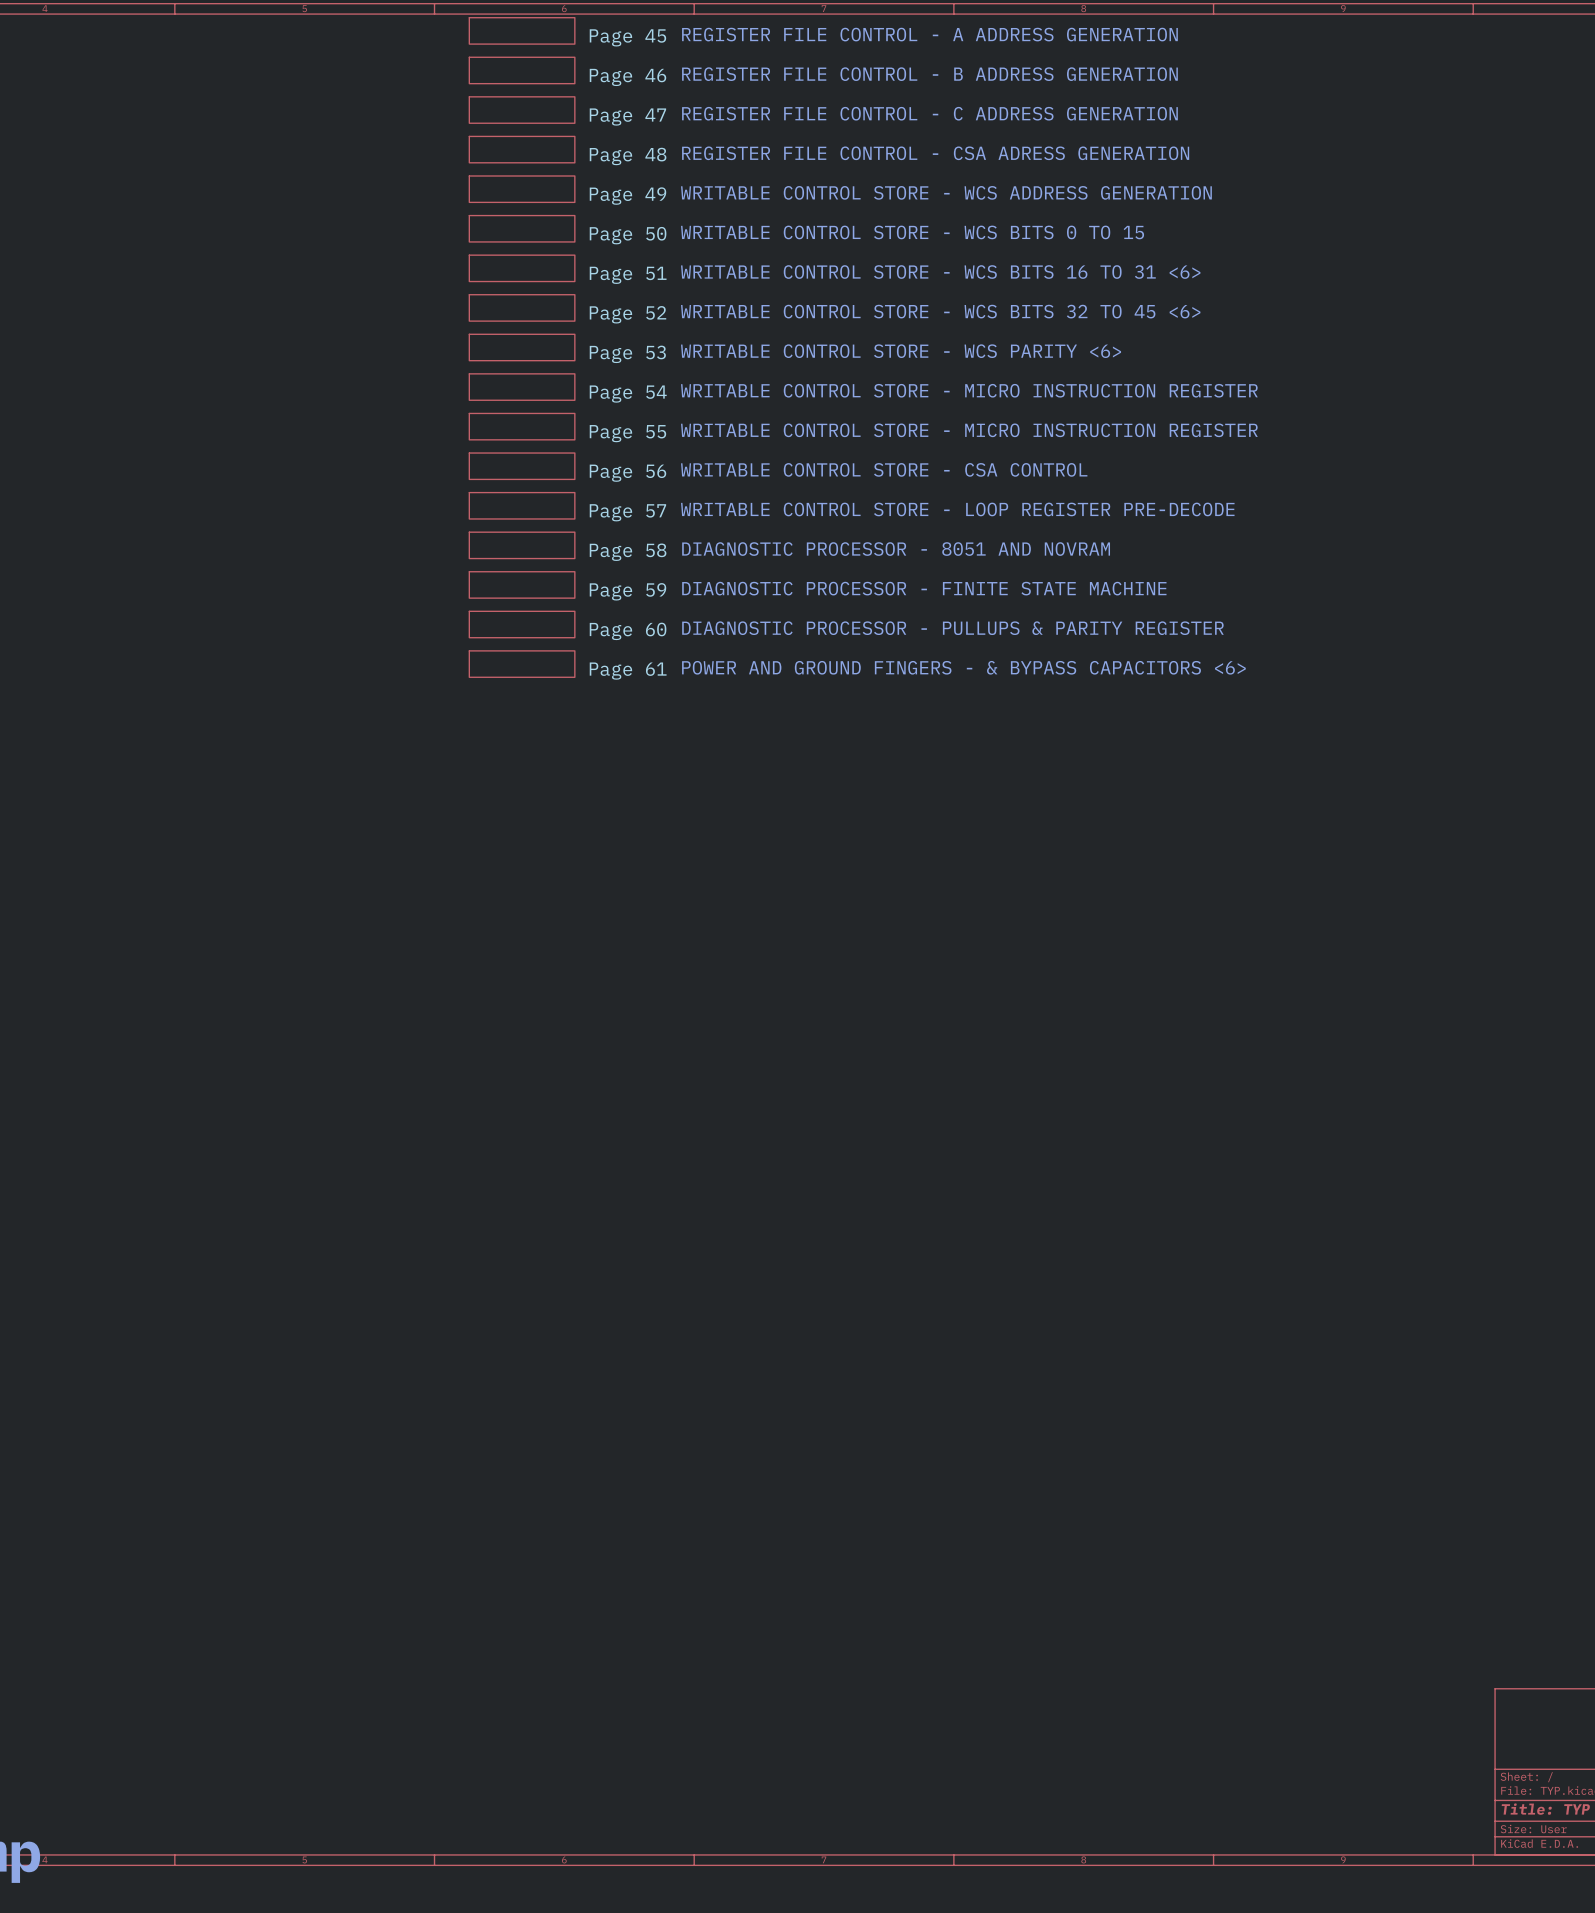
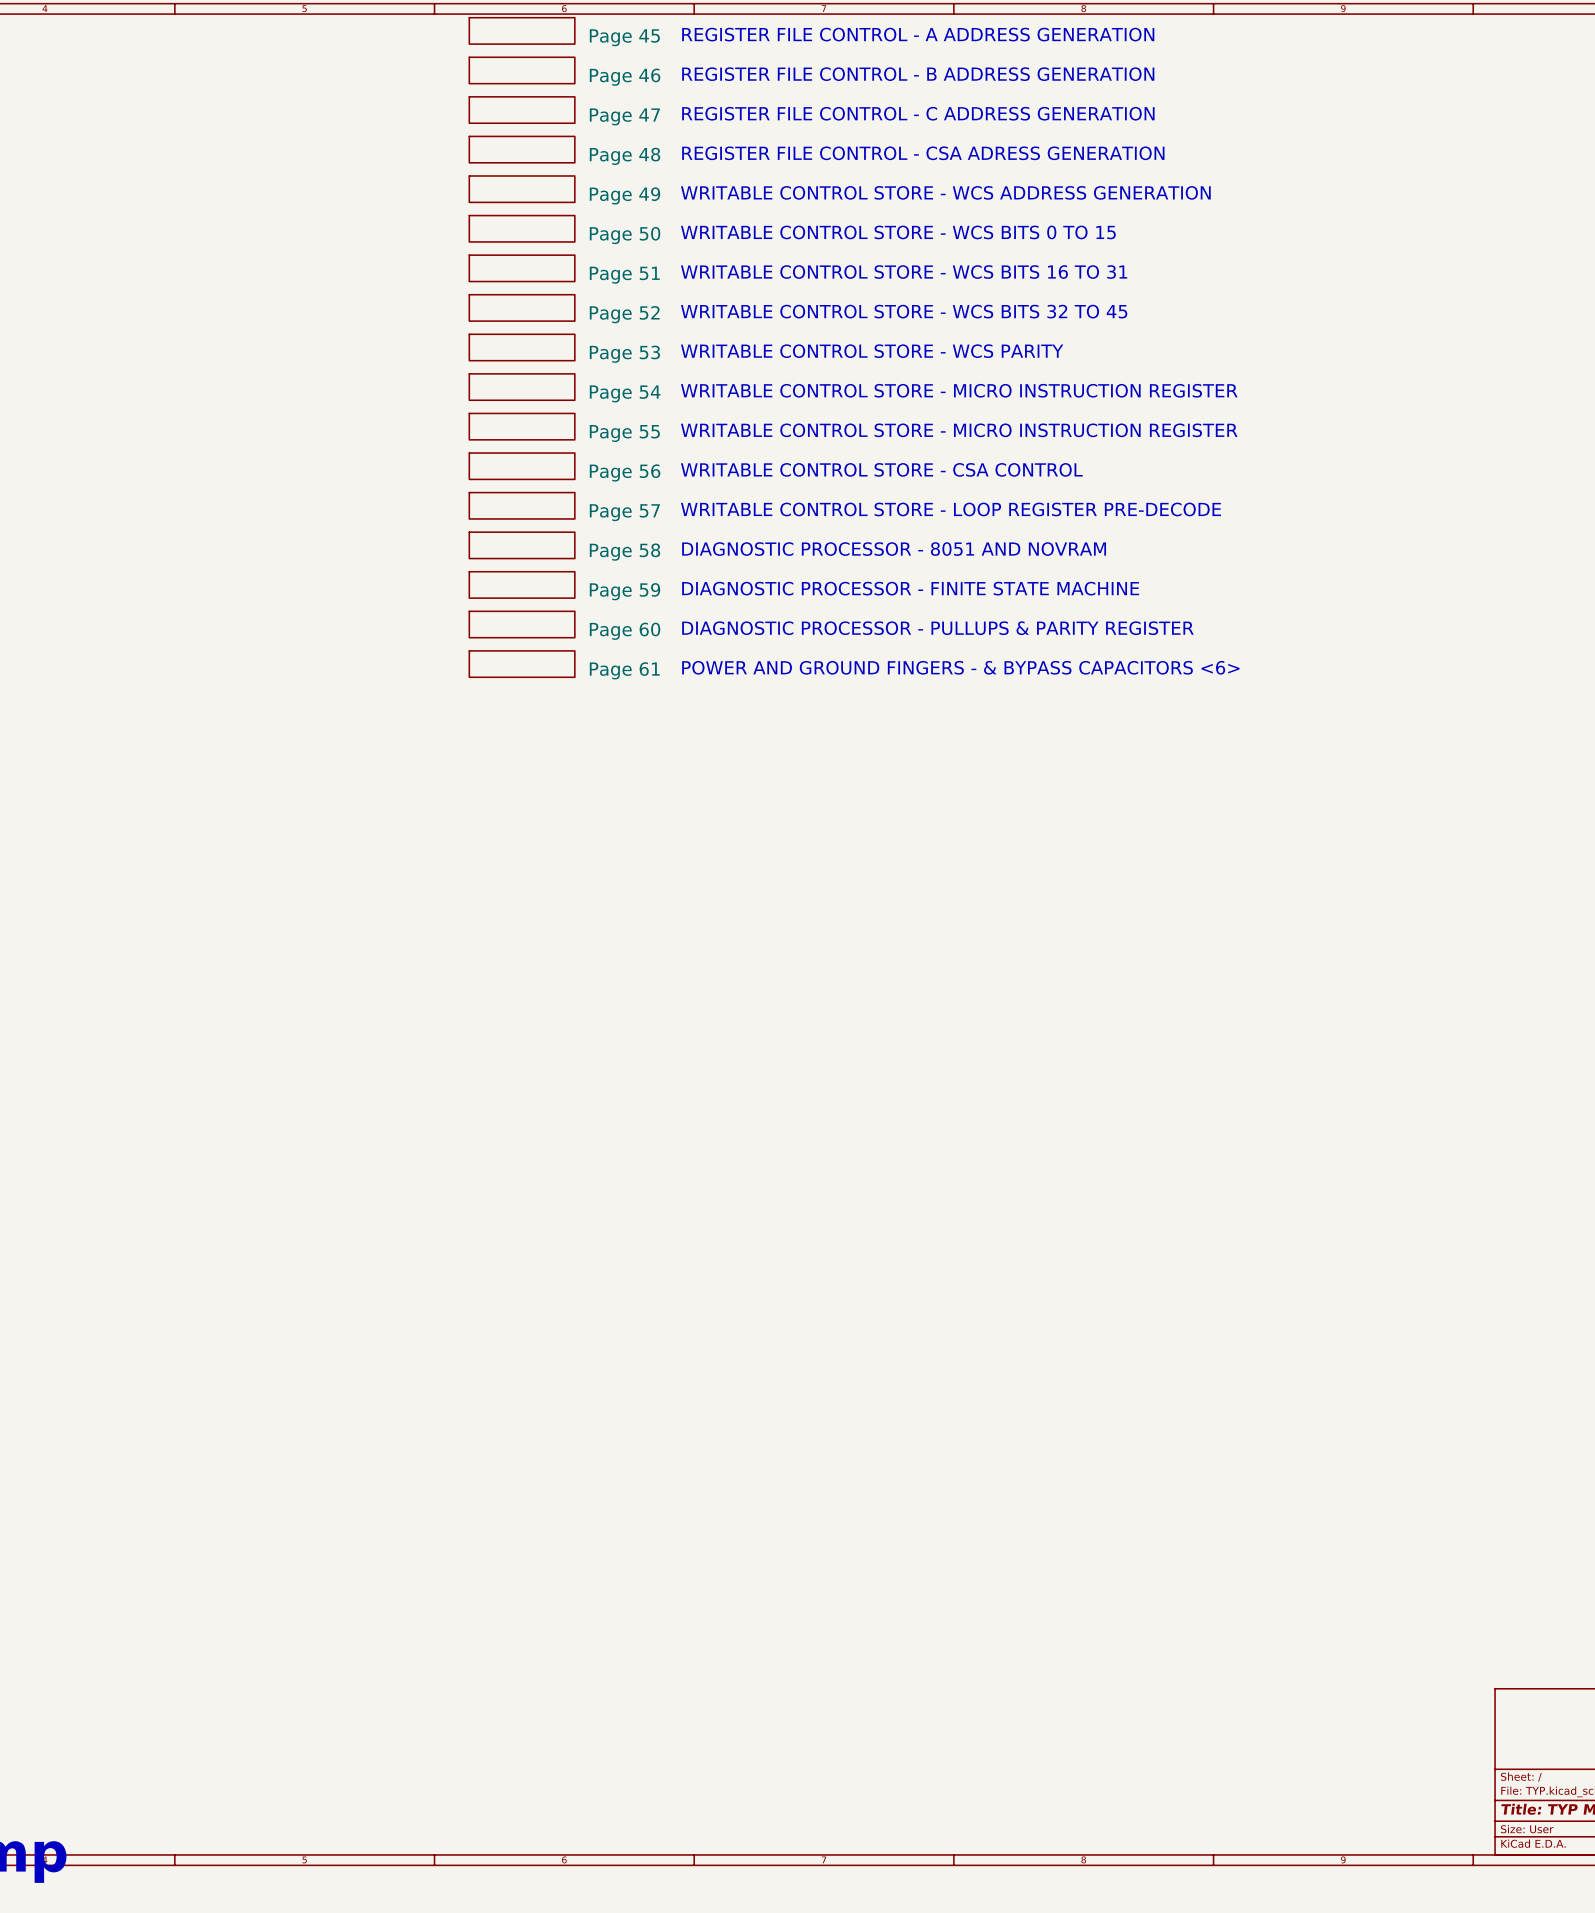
text: WRITABLE CONTROL STORE - WCS BITS 16 TO 31 <6> (940, 272) -> WRITABLE CONTROL STORE - WCS BITS 16 TO 31 (904, 272)
text: WRITABLE CONTROL STORE - WCS BITS 32 TO 45 <6> (940, 311) -> WRITABLE CONTROL STORE - WCS BITS 32 TO 45 (904, 311)
text: WRITABLE CONTROL STORE - WCS PARITY <6> (901, 351) -> WRITABLE CONTROL STORE - WCS PARITY (872, 351)

